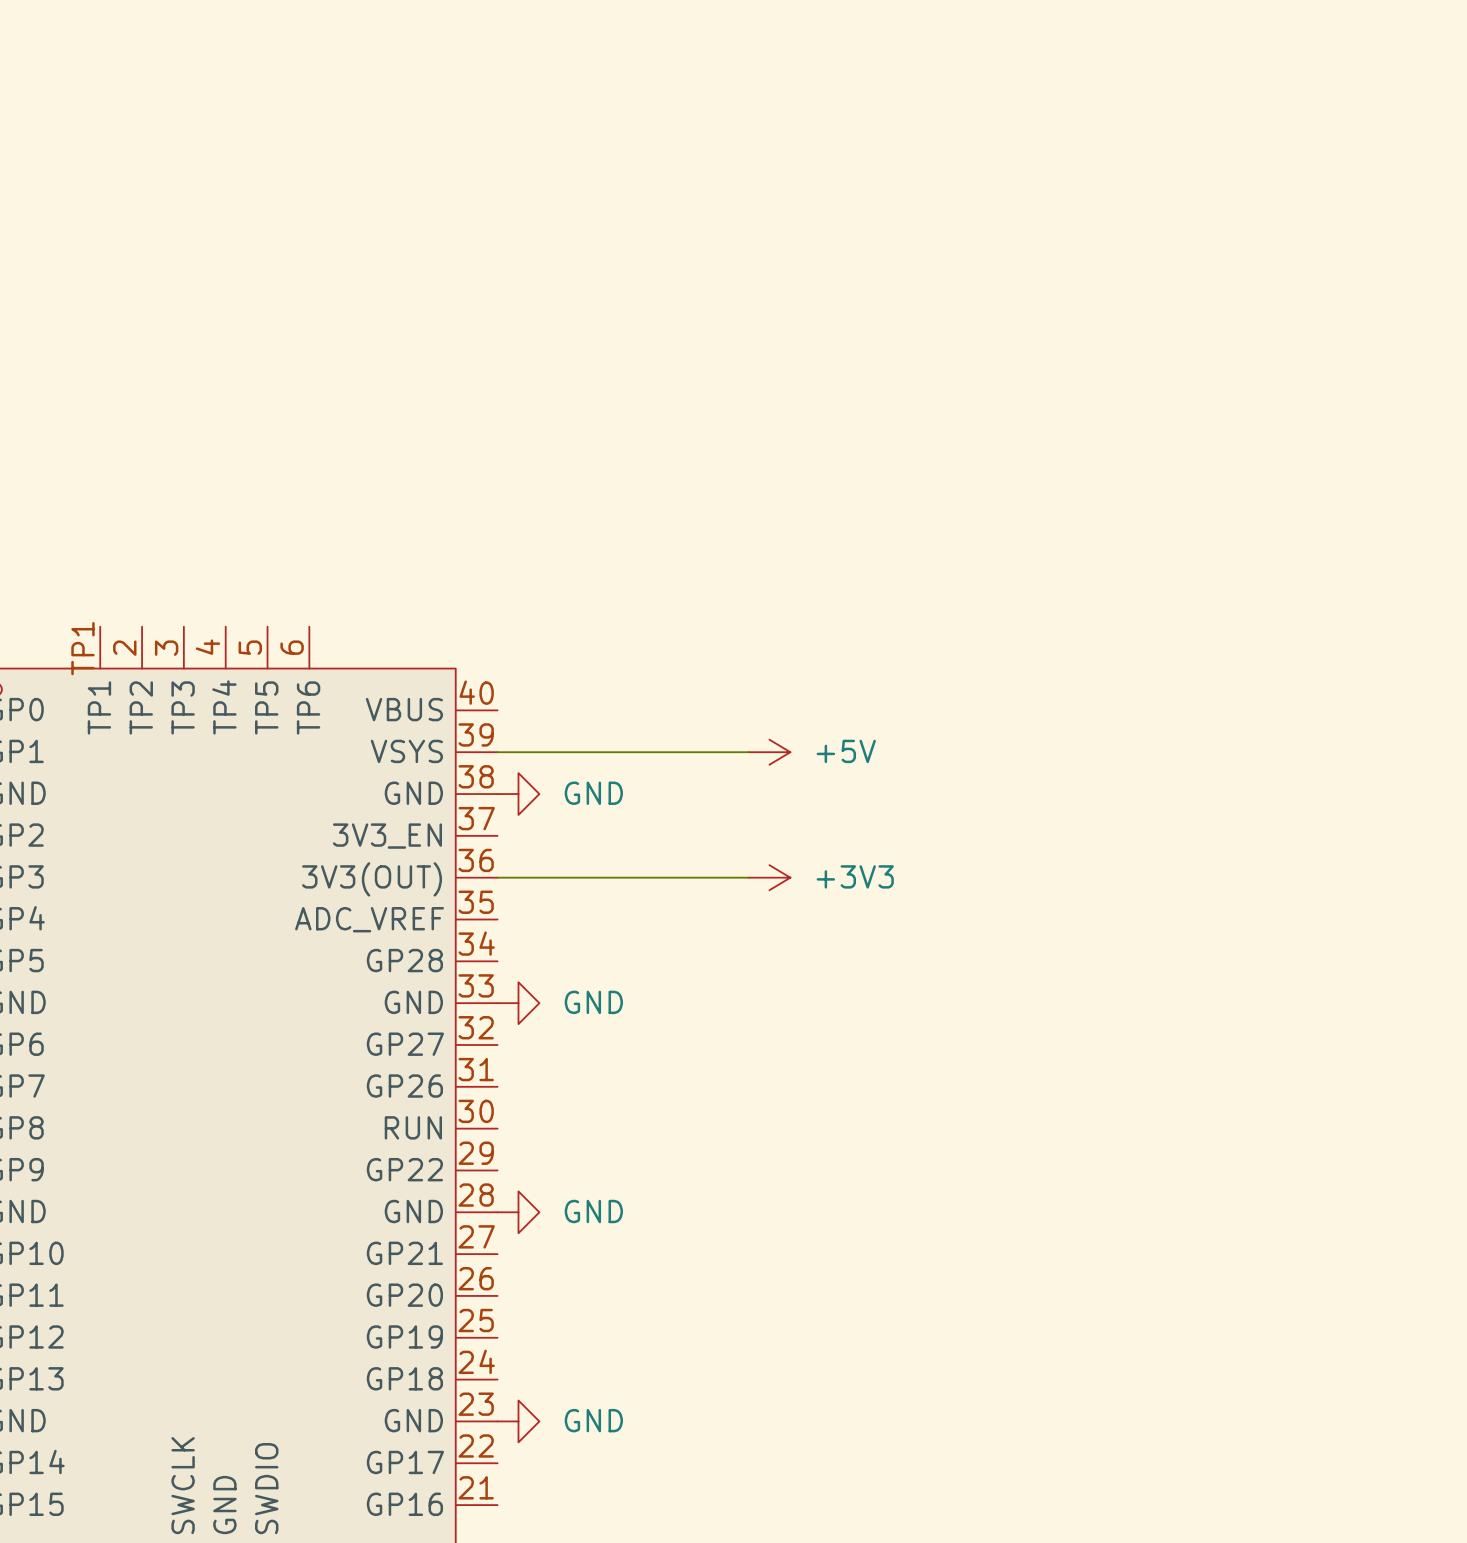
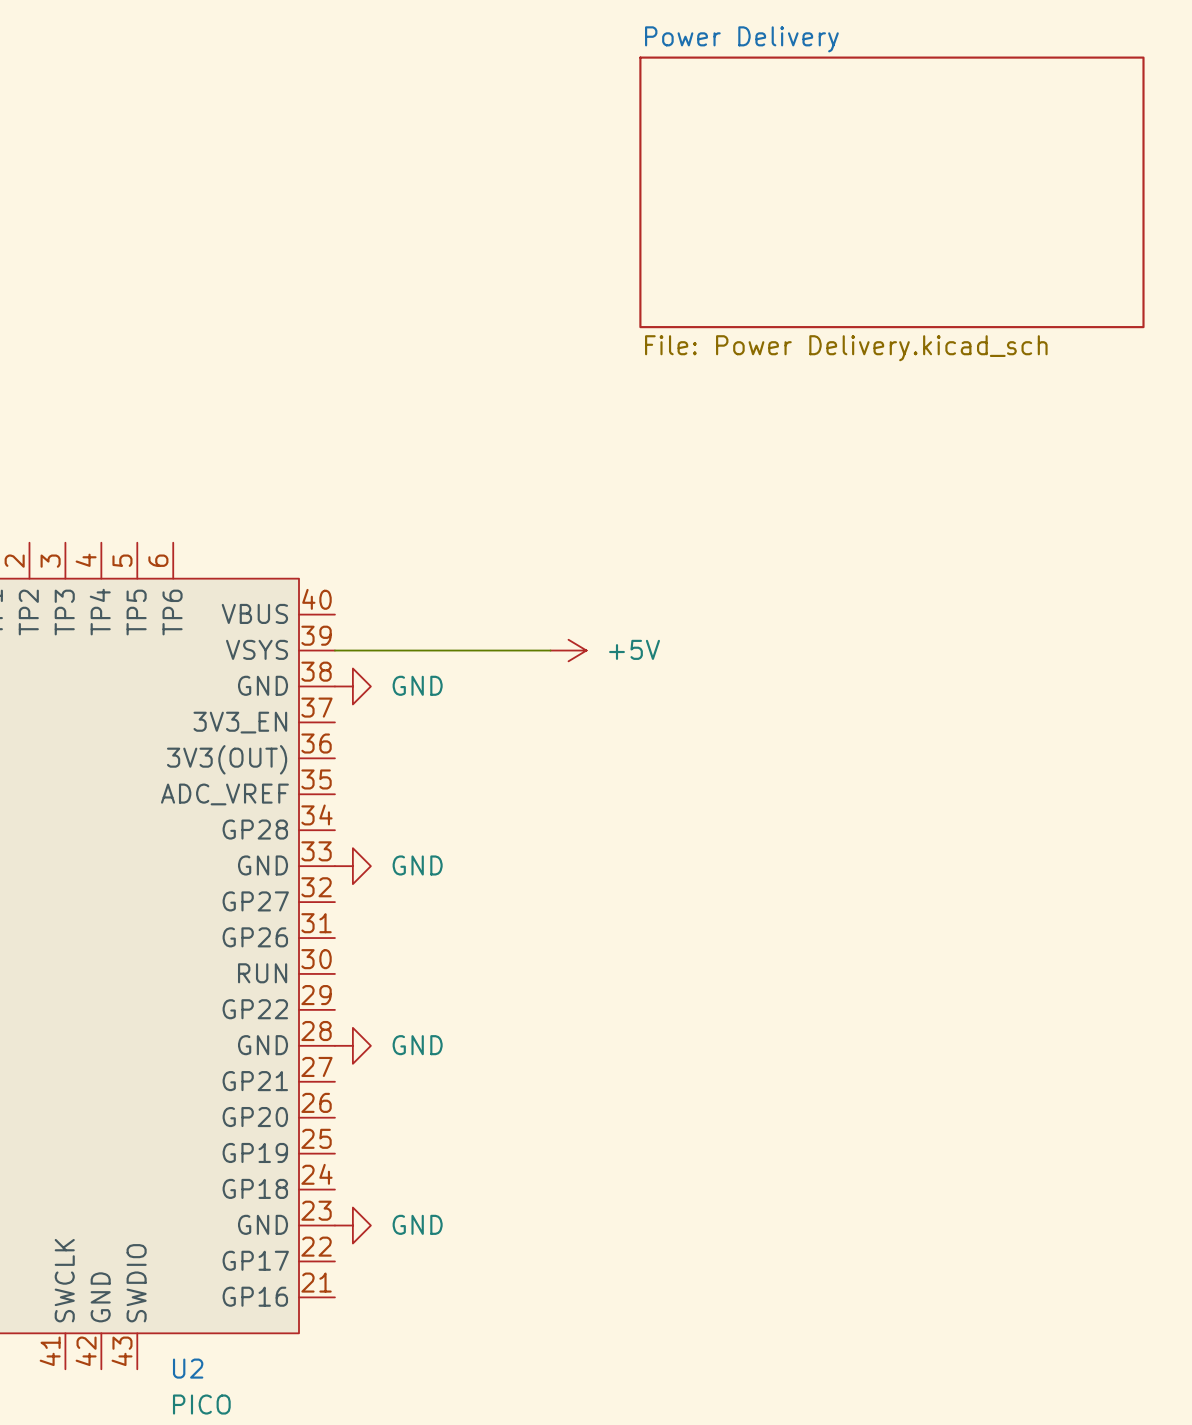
sheet Power Delivery: none -> File: Power Delivery.kicad_sch (891, 192)
wire: (497, 877) (748, 877) -> none
power symbol: +3V3 (769, 877) -> none

